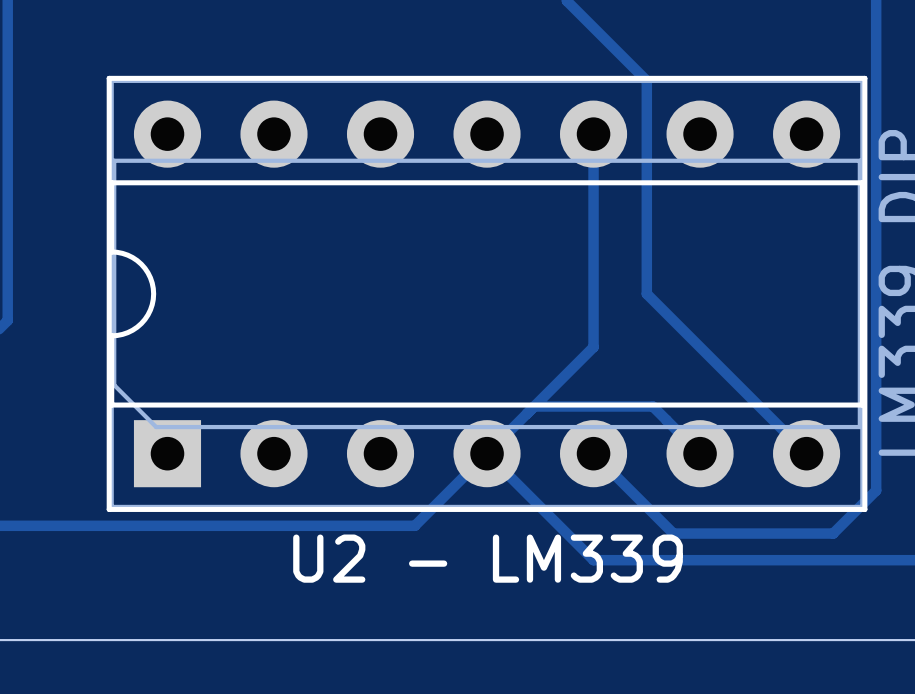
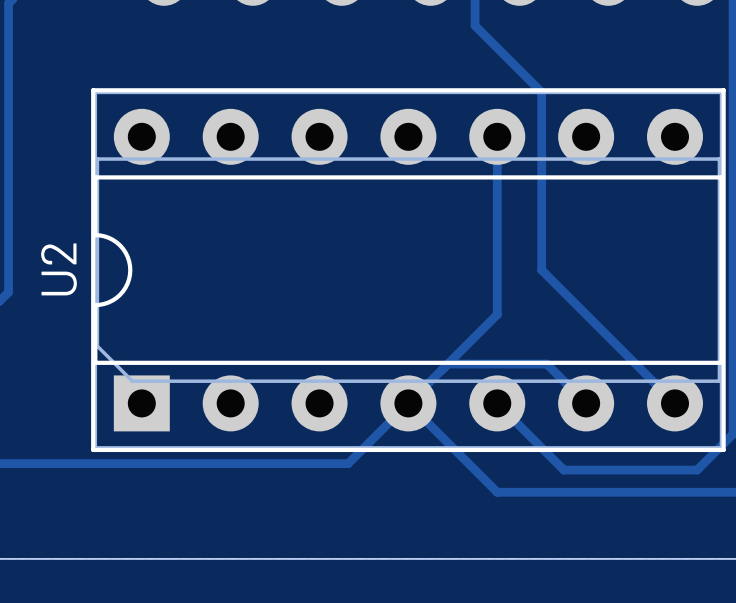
U2 - LM339 name: U2 - LM339 (488, 558) -> U2 (59, 269)

